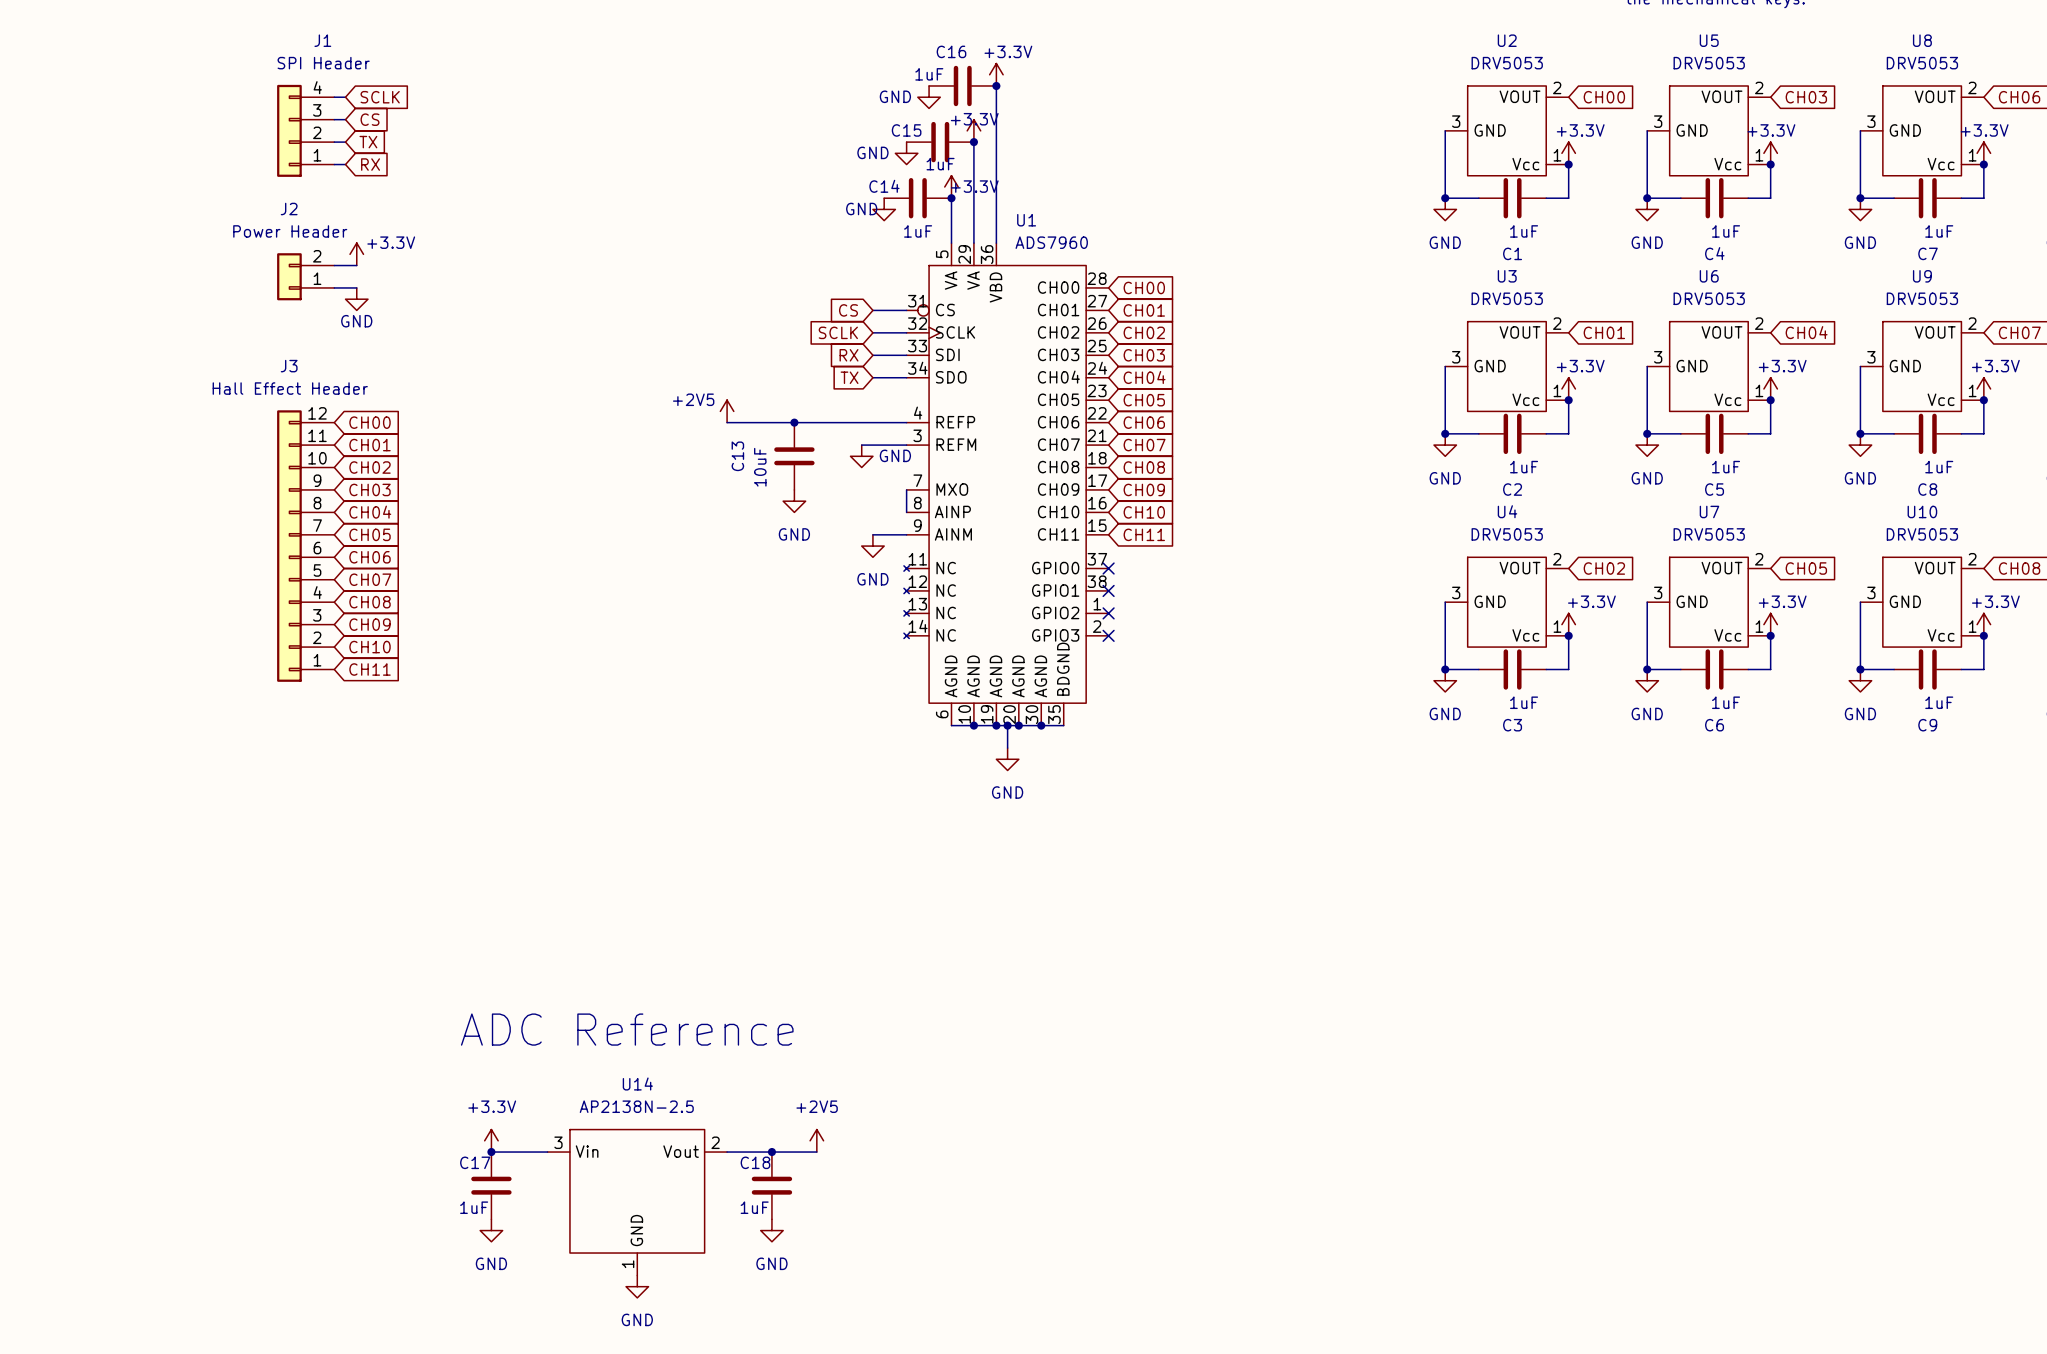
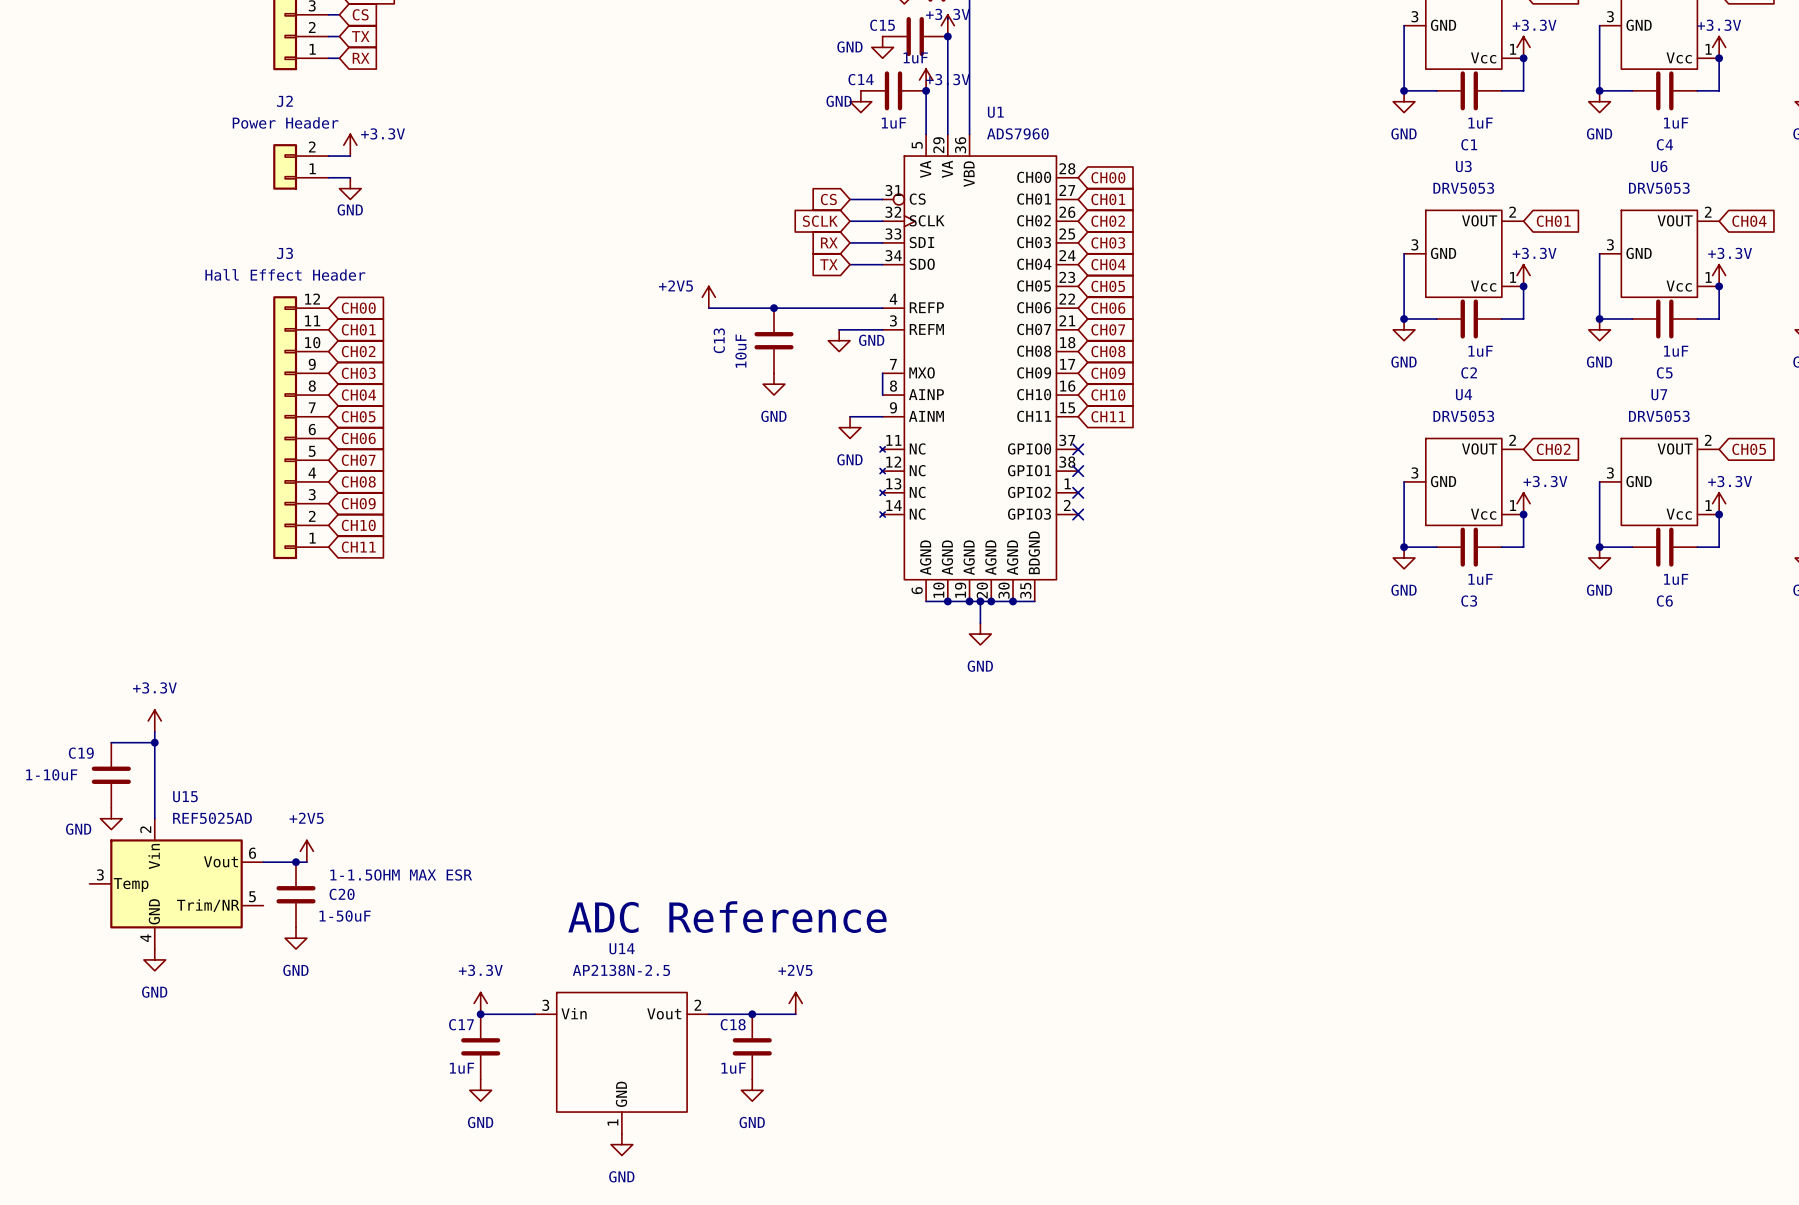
power symbol: none -> +3.3V (154, 720)
wire: none -> (154, 731) (154, 818)
wire: none -> (111, 742) (154, 742)
junction: none -> (154, 742)
C19: none -> 1-10uF (111, 775)
power symbol: none -> GND (111, 818)
power symbol: none -> +2V5 (306, 851)
wire: none -> (263, 862) (306, 862)
junction: none -> (296, 862)
text: none -> 1-1.5OHM MAX ESR (401, 875)
U15: none -> REF5025AD (176, 883)
C20: none -> 1-50uF (296, 894)
text position: ADC Reference (627, 1029) -> ADC Reference (727, 917)
power symbol: none -> GND (296, 938)
power symbol: none -> GND (154, 959)

